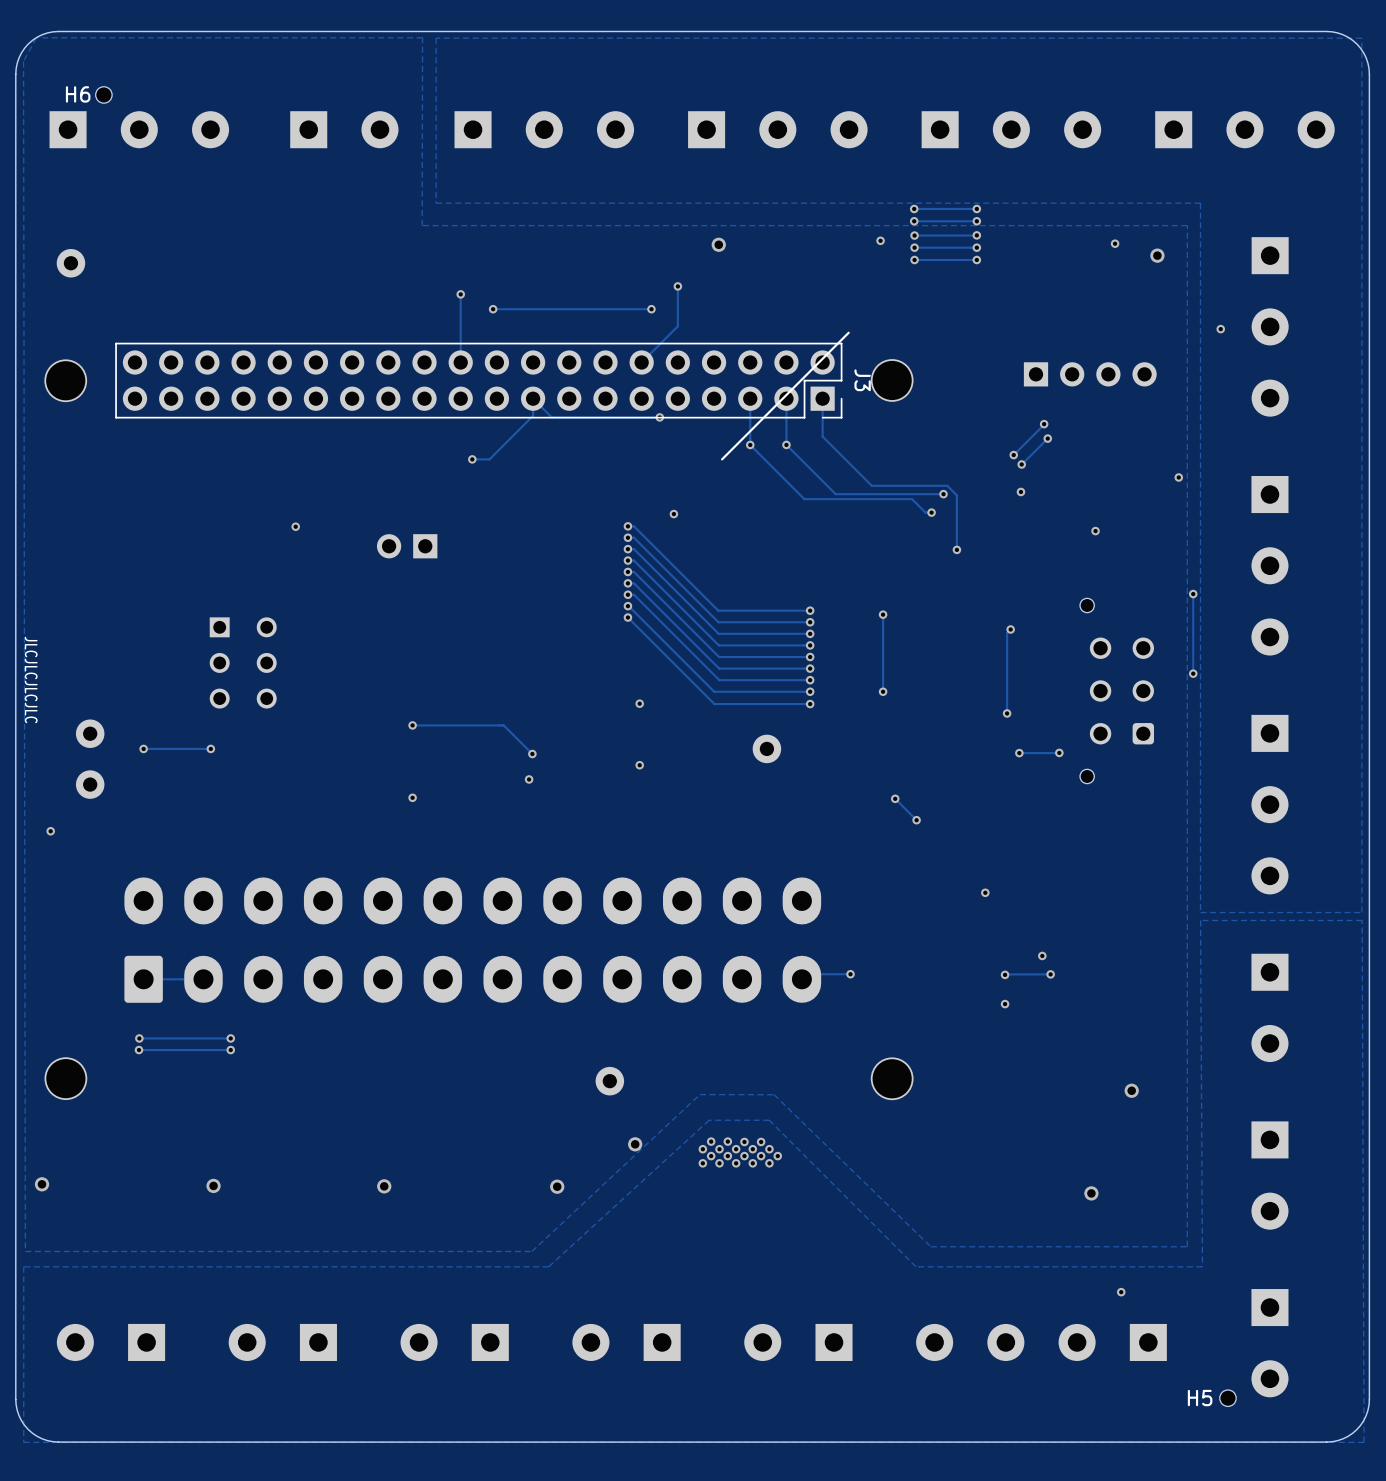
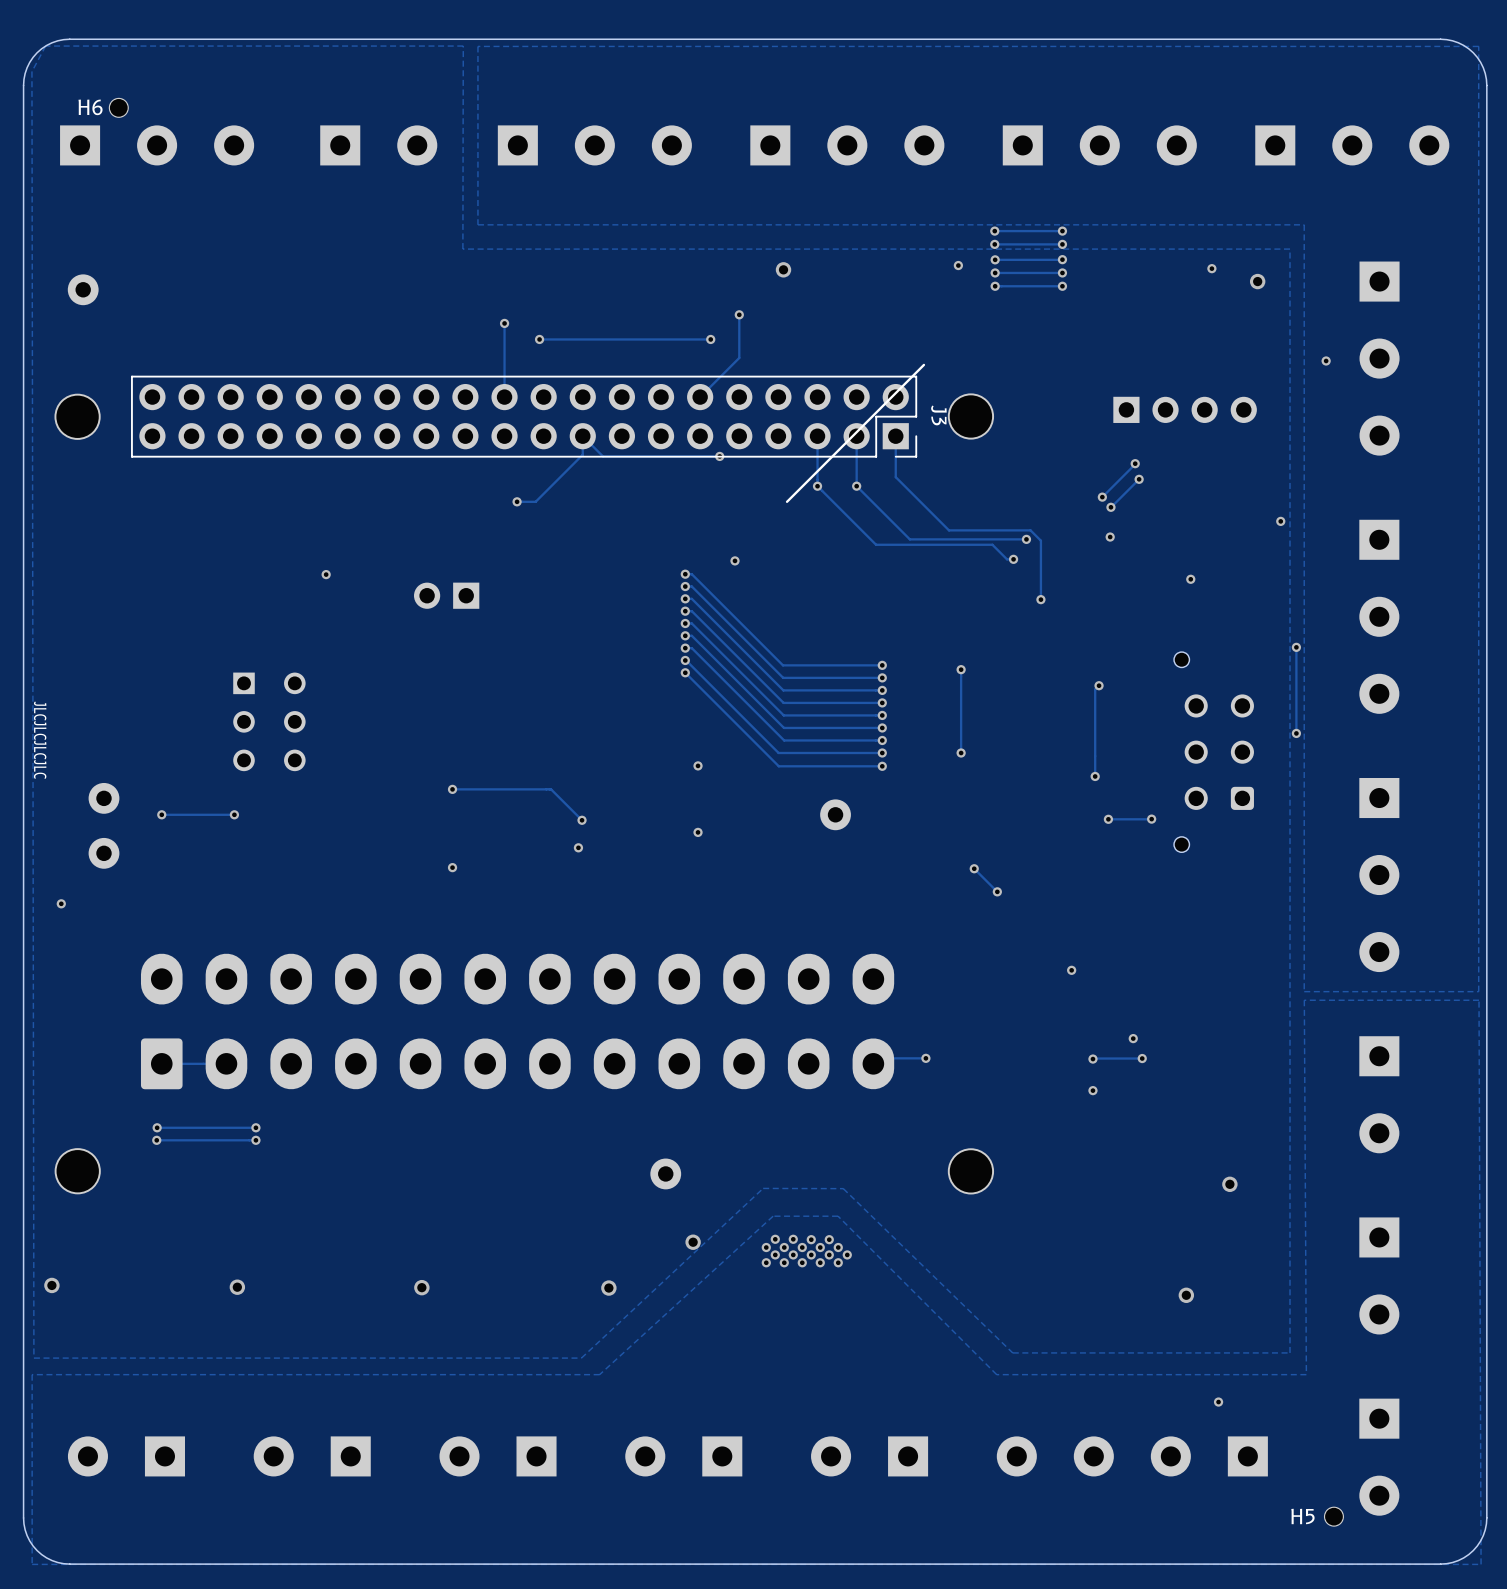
H6 footprint: [95, 86, 113, 104] -> [108, 97, 129, 118]
H5 footprint: [1219, 1389, 1237, 1407] -> [1323, 1506, 1344, 1527]

